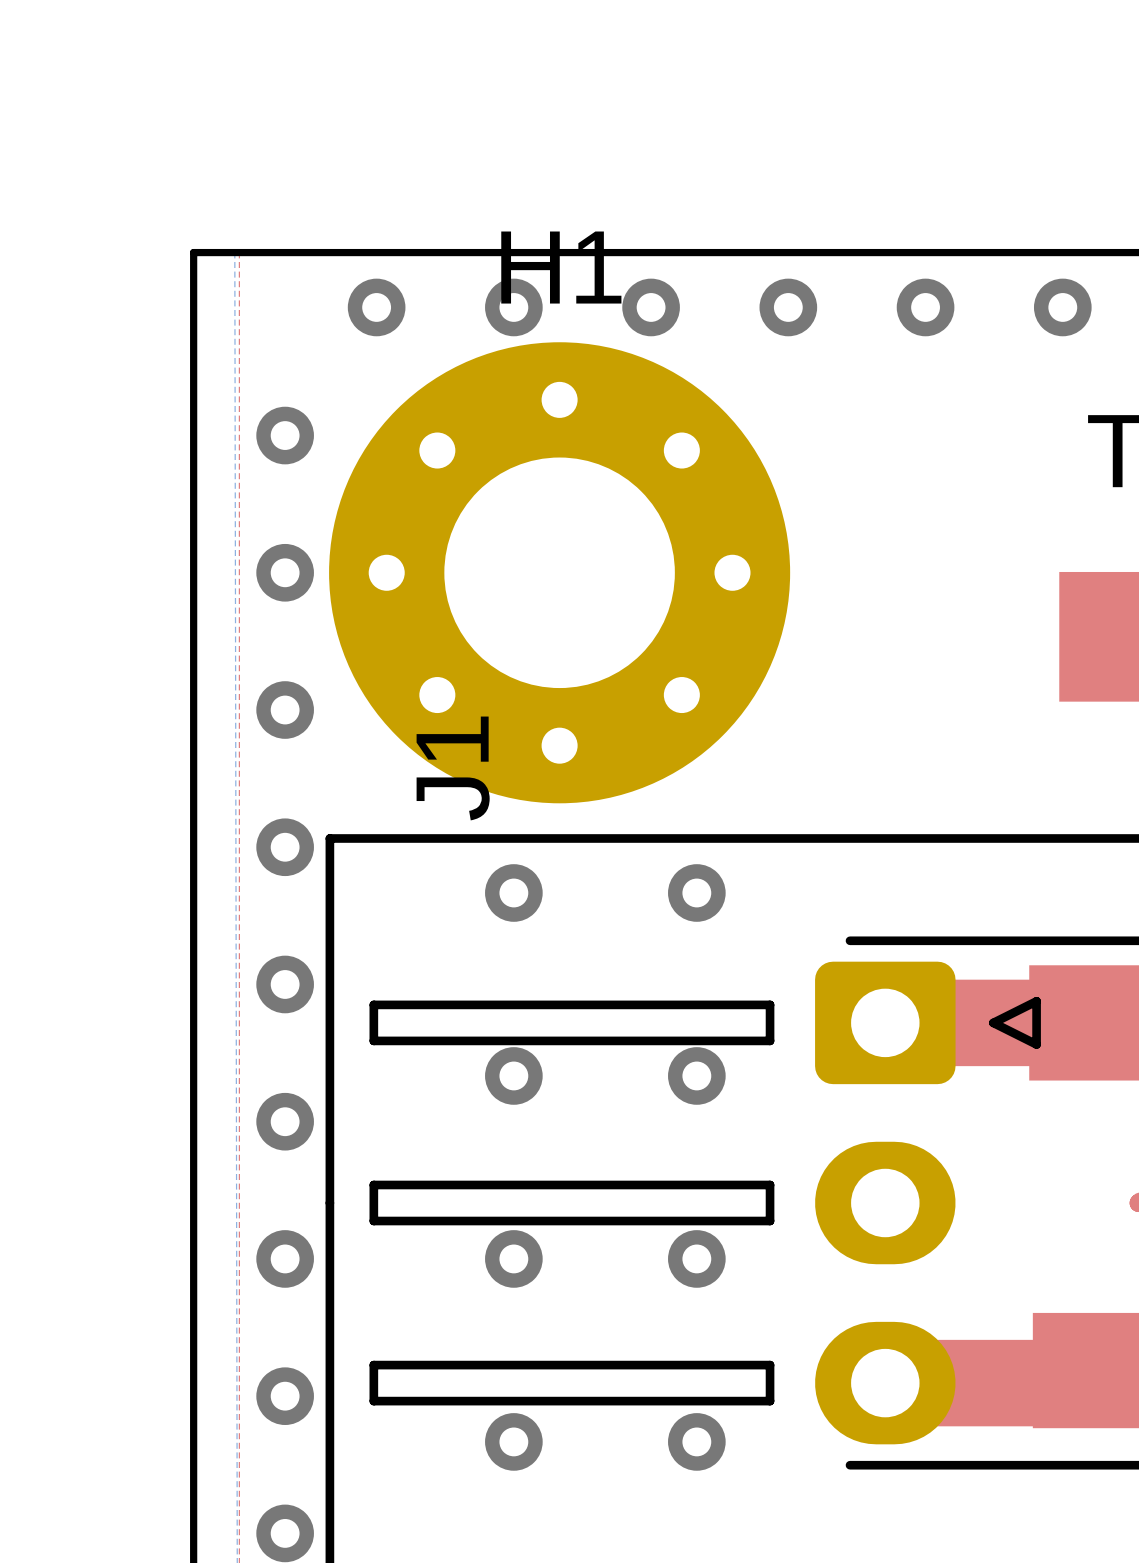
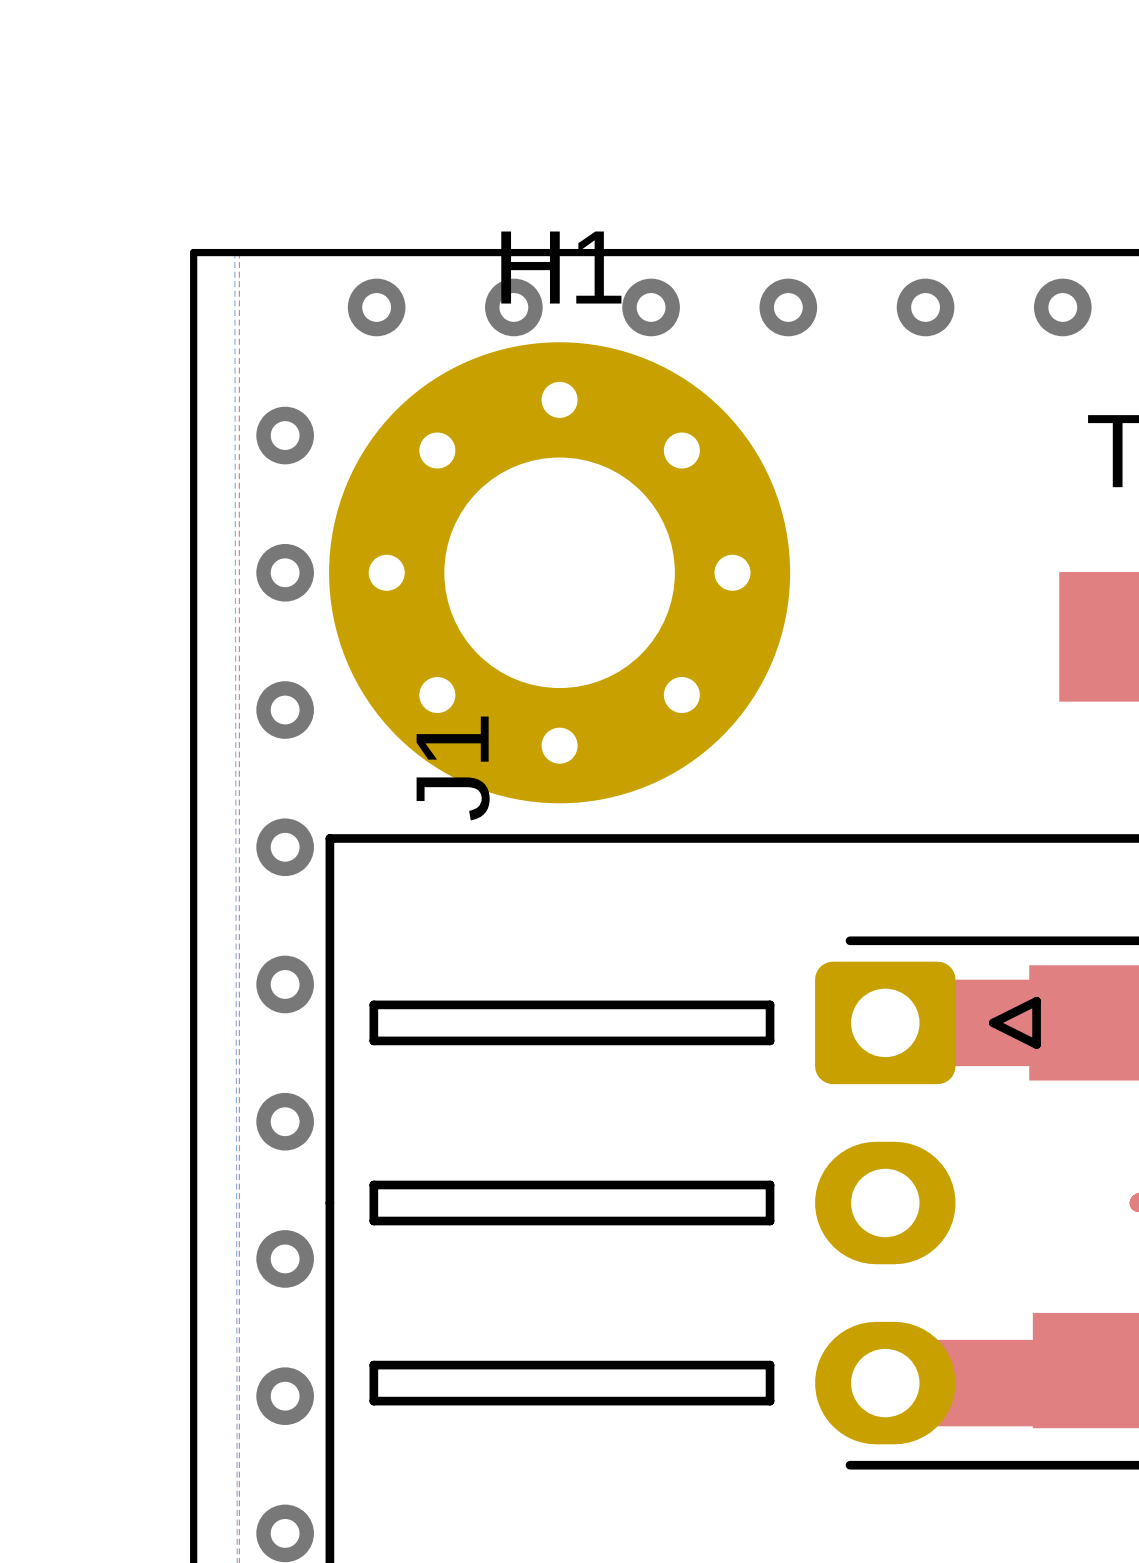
via: (513, 892) -> none
via: (696, 892) -> none
via: (513, 1075) -> none
via: (696, 1075) -> none
via: (513, 1258) -> none
via: (696, 1258) -> none
via: (513, 1441) -> none
via: (696, 1441) -> none

